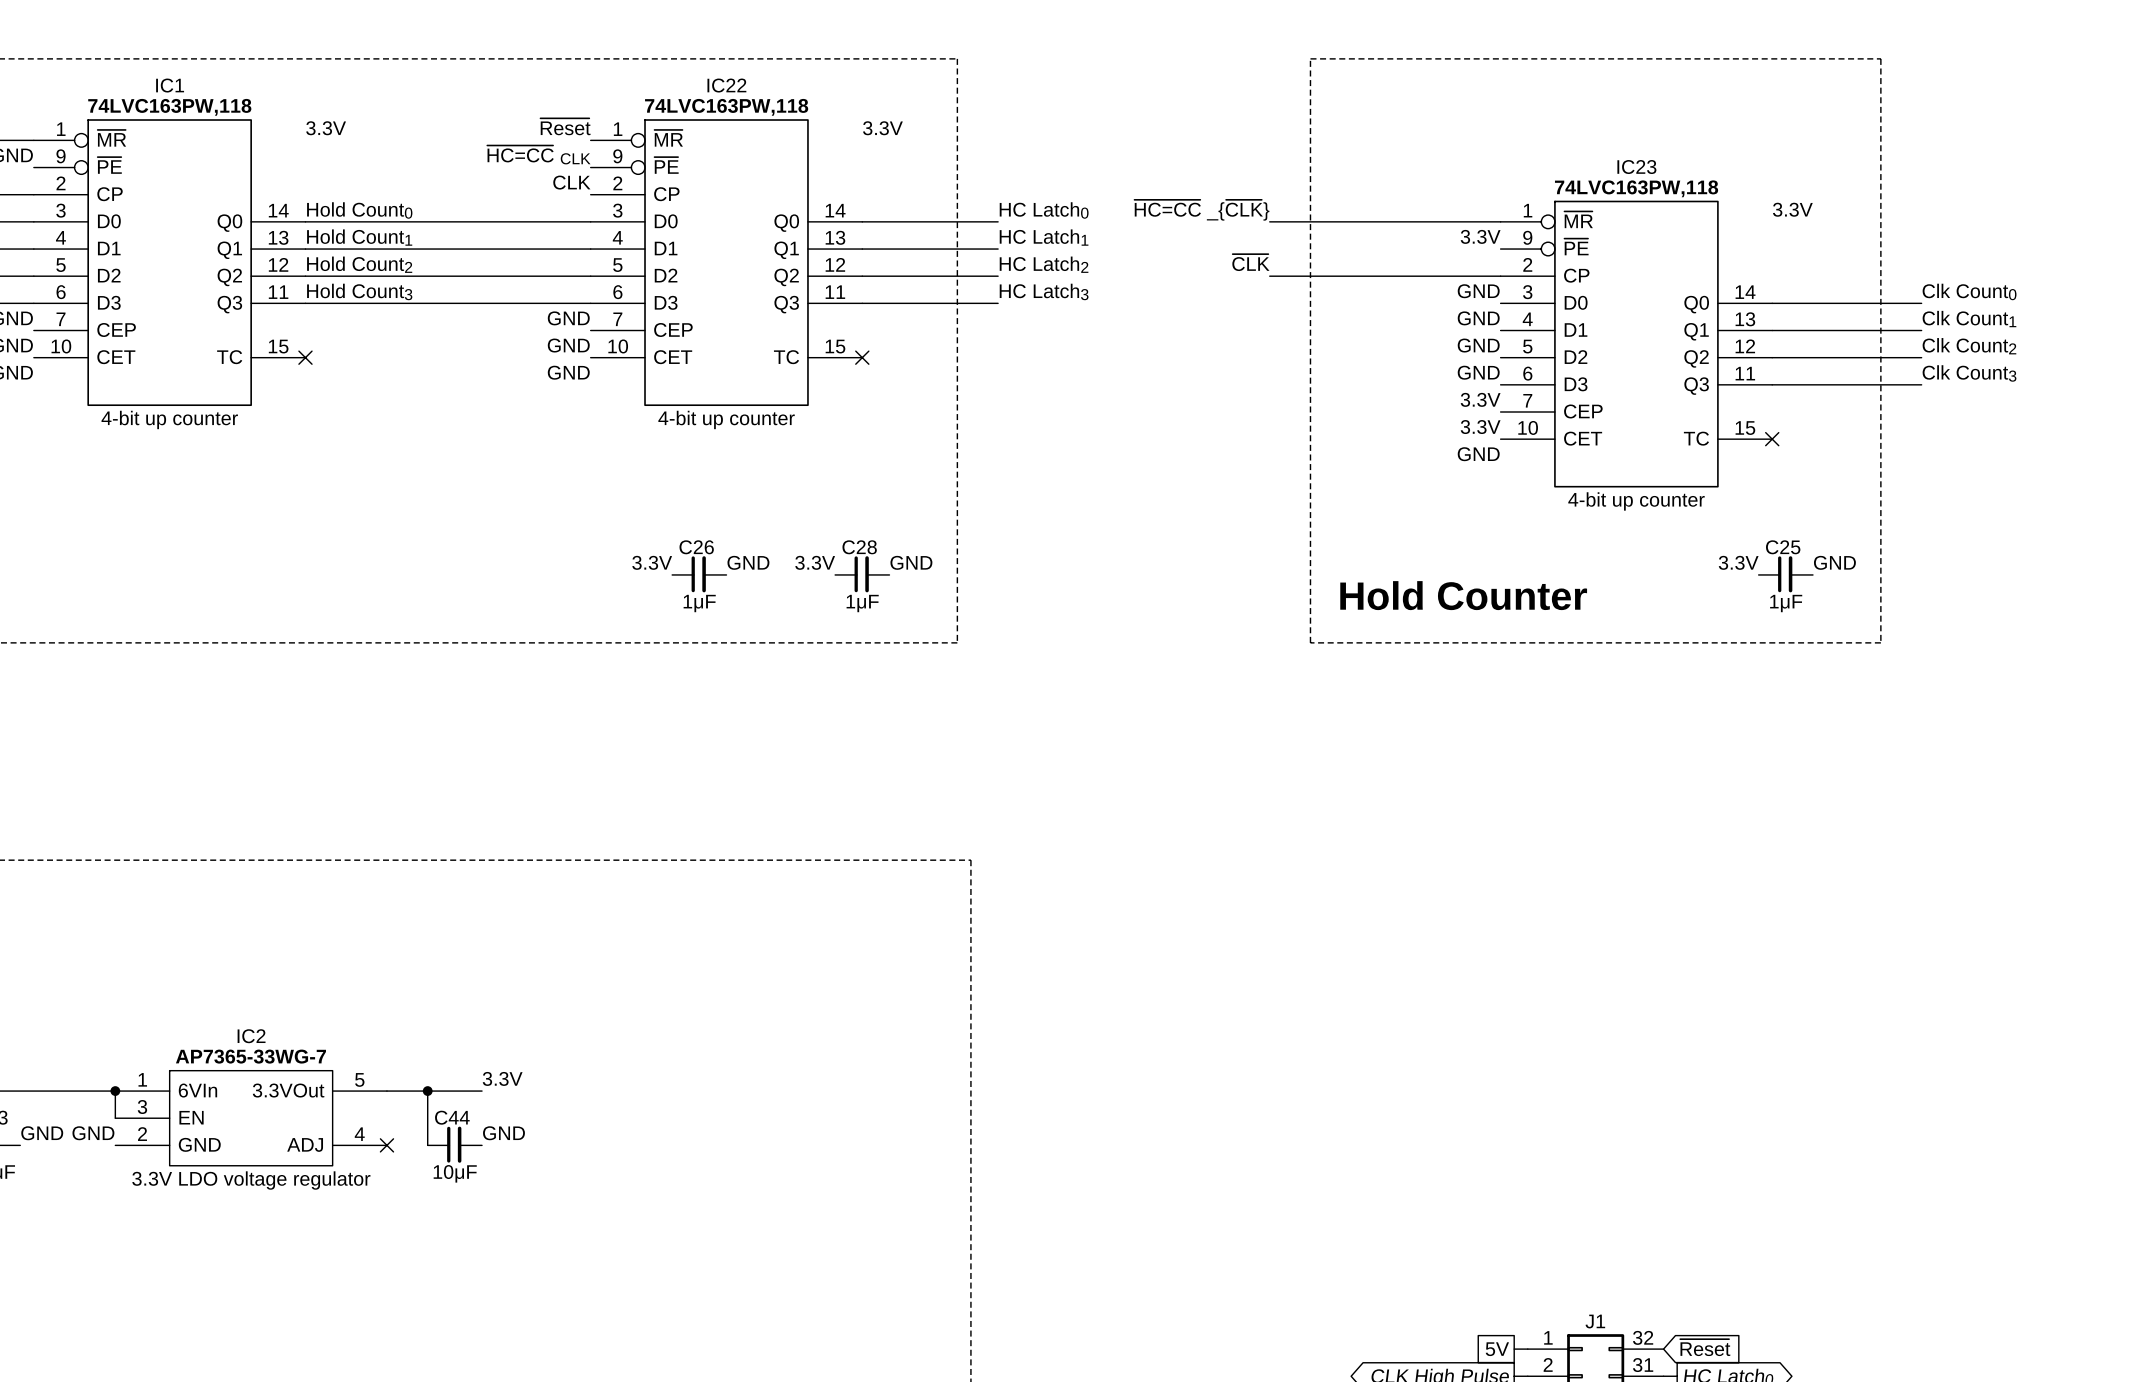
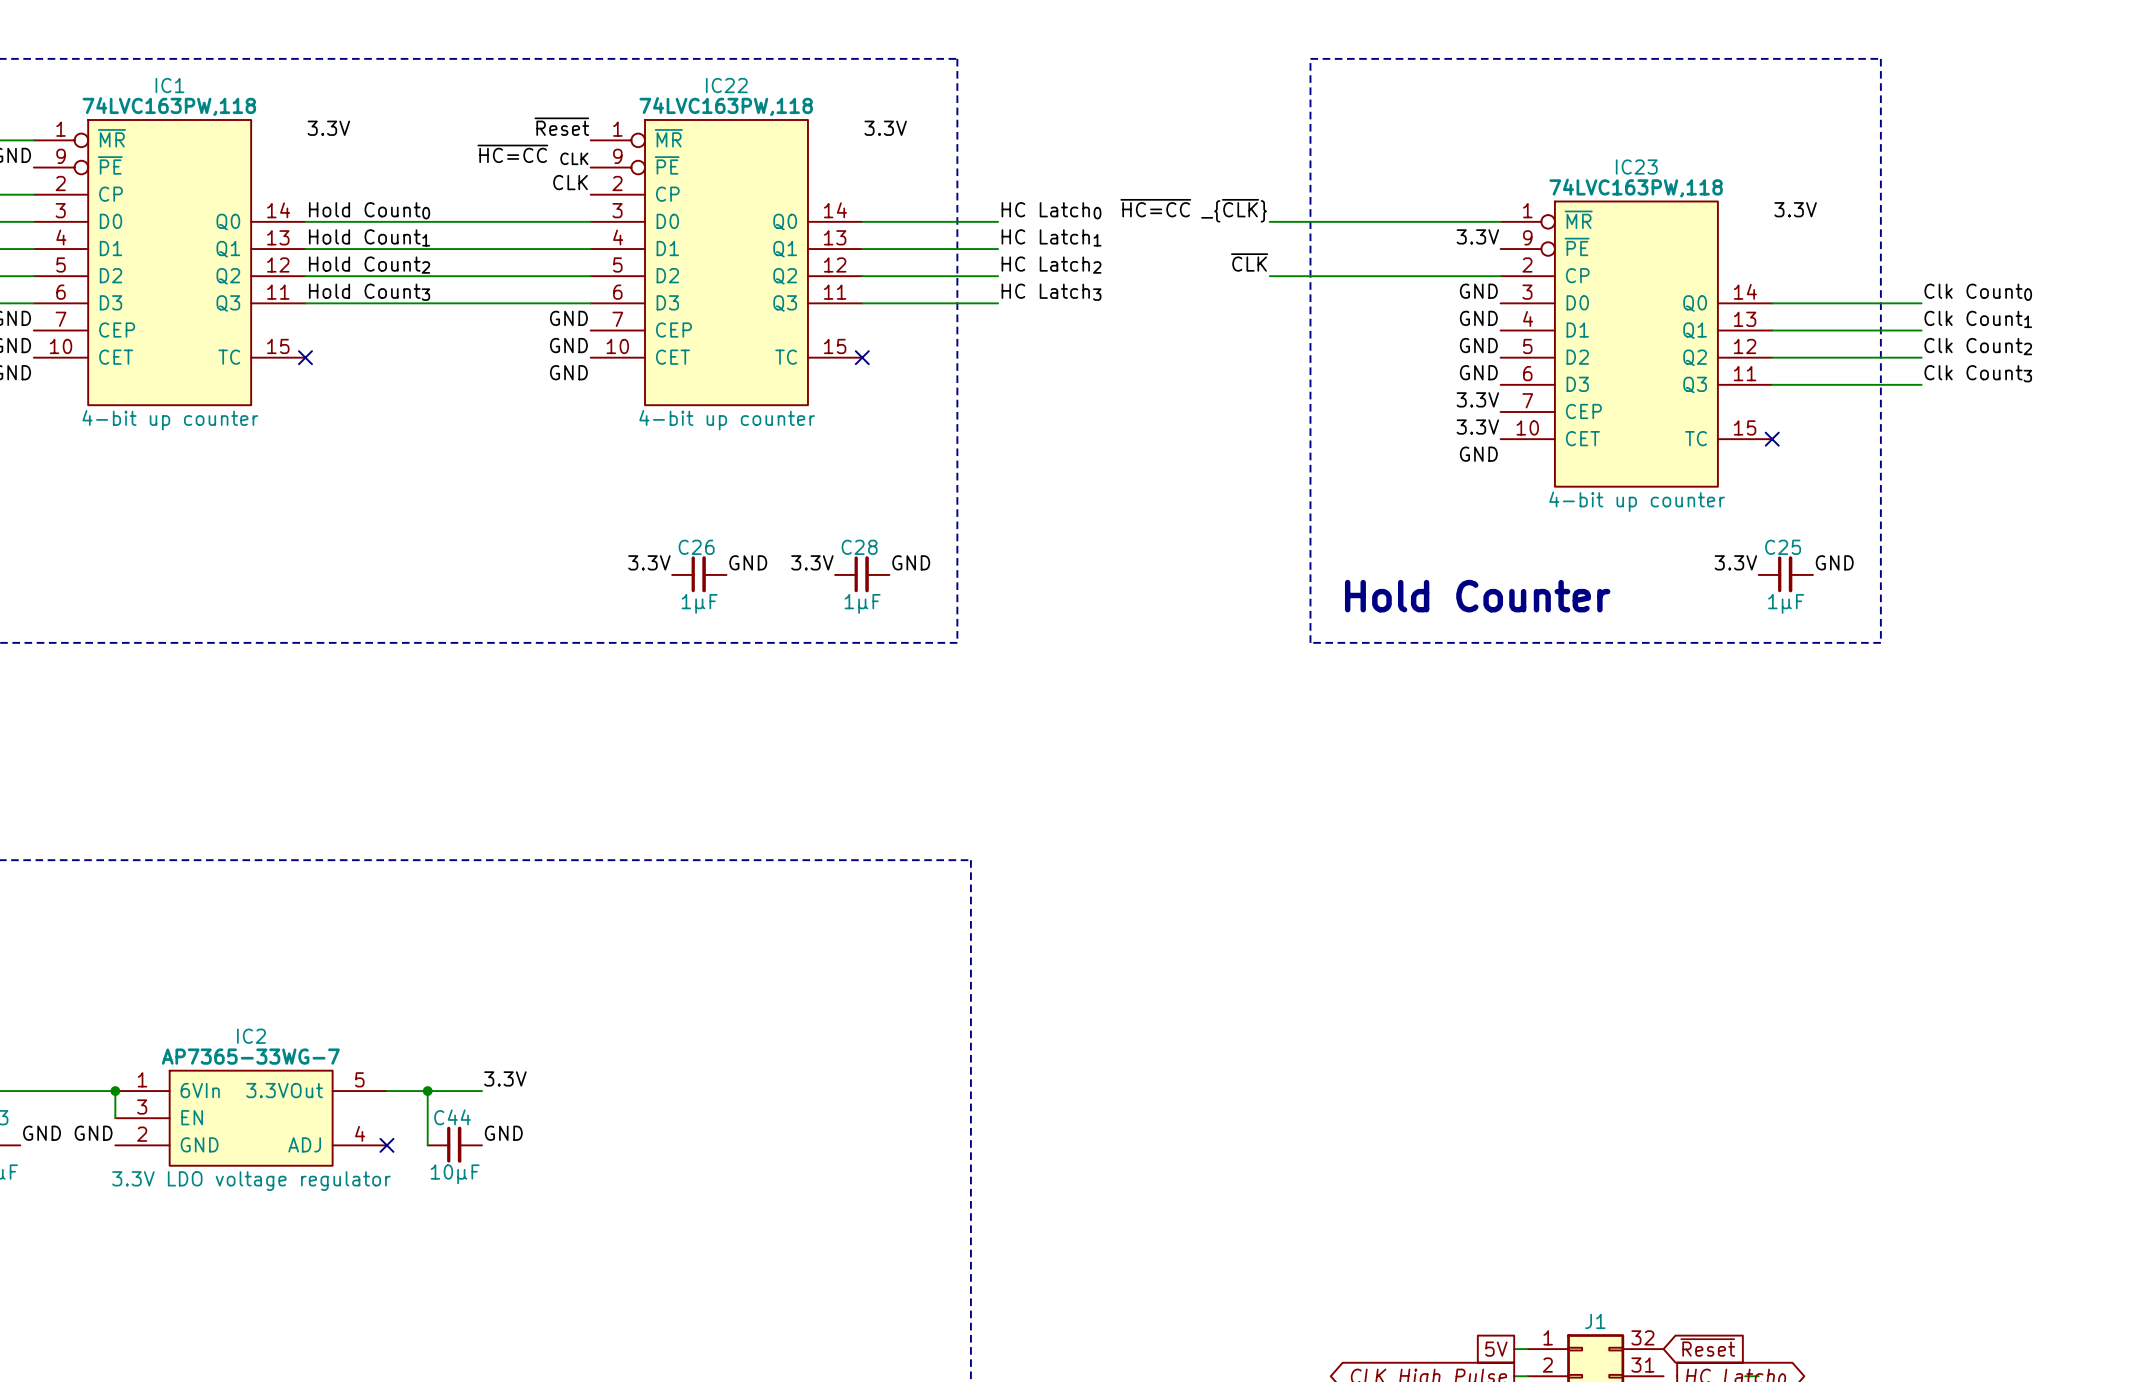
wire: (1663, 1376) (1677, 1376) -> (1745, 1376) (1758, 1376)

